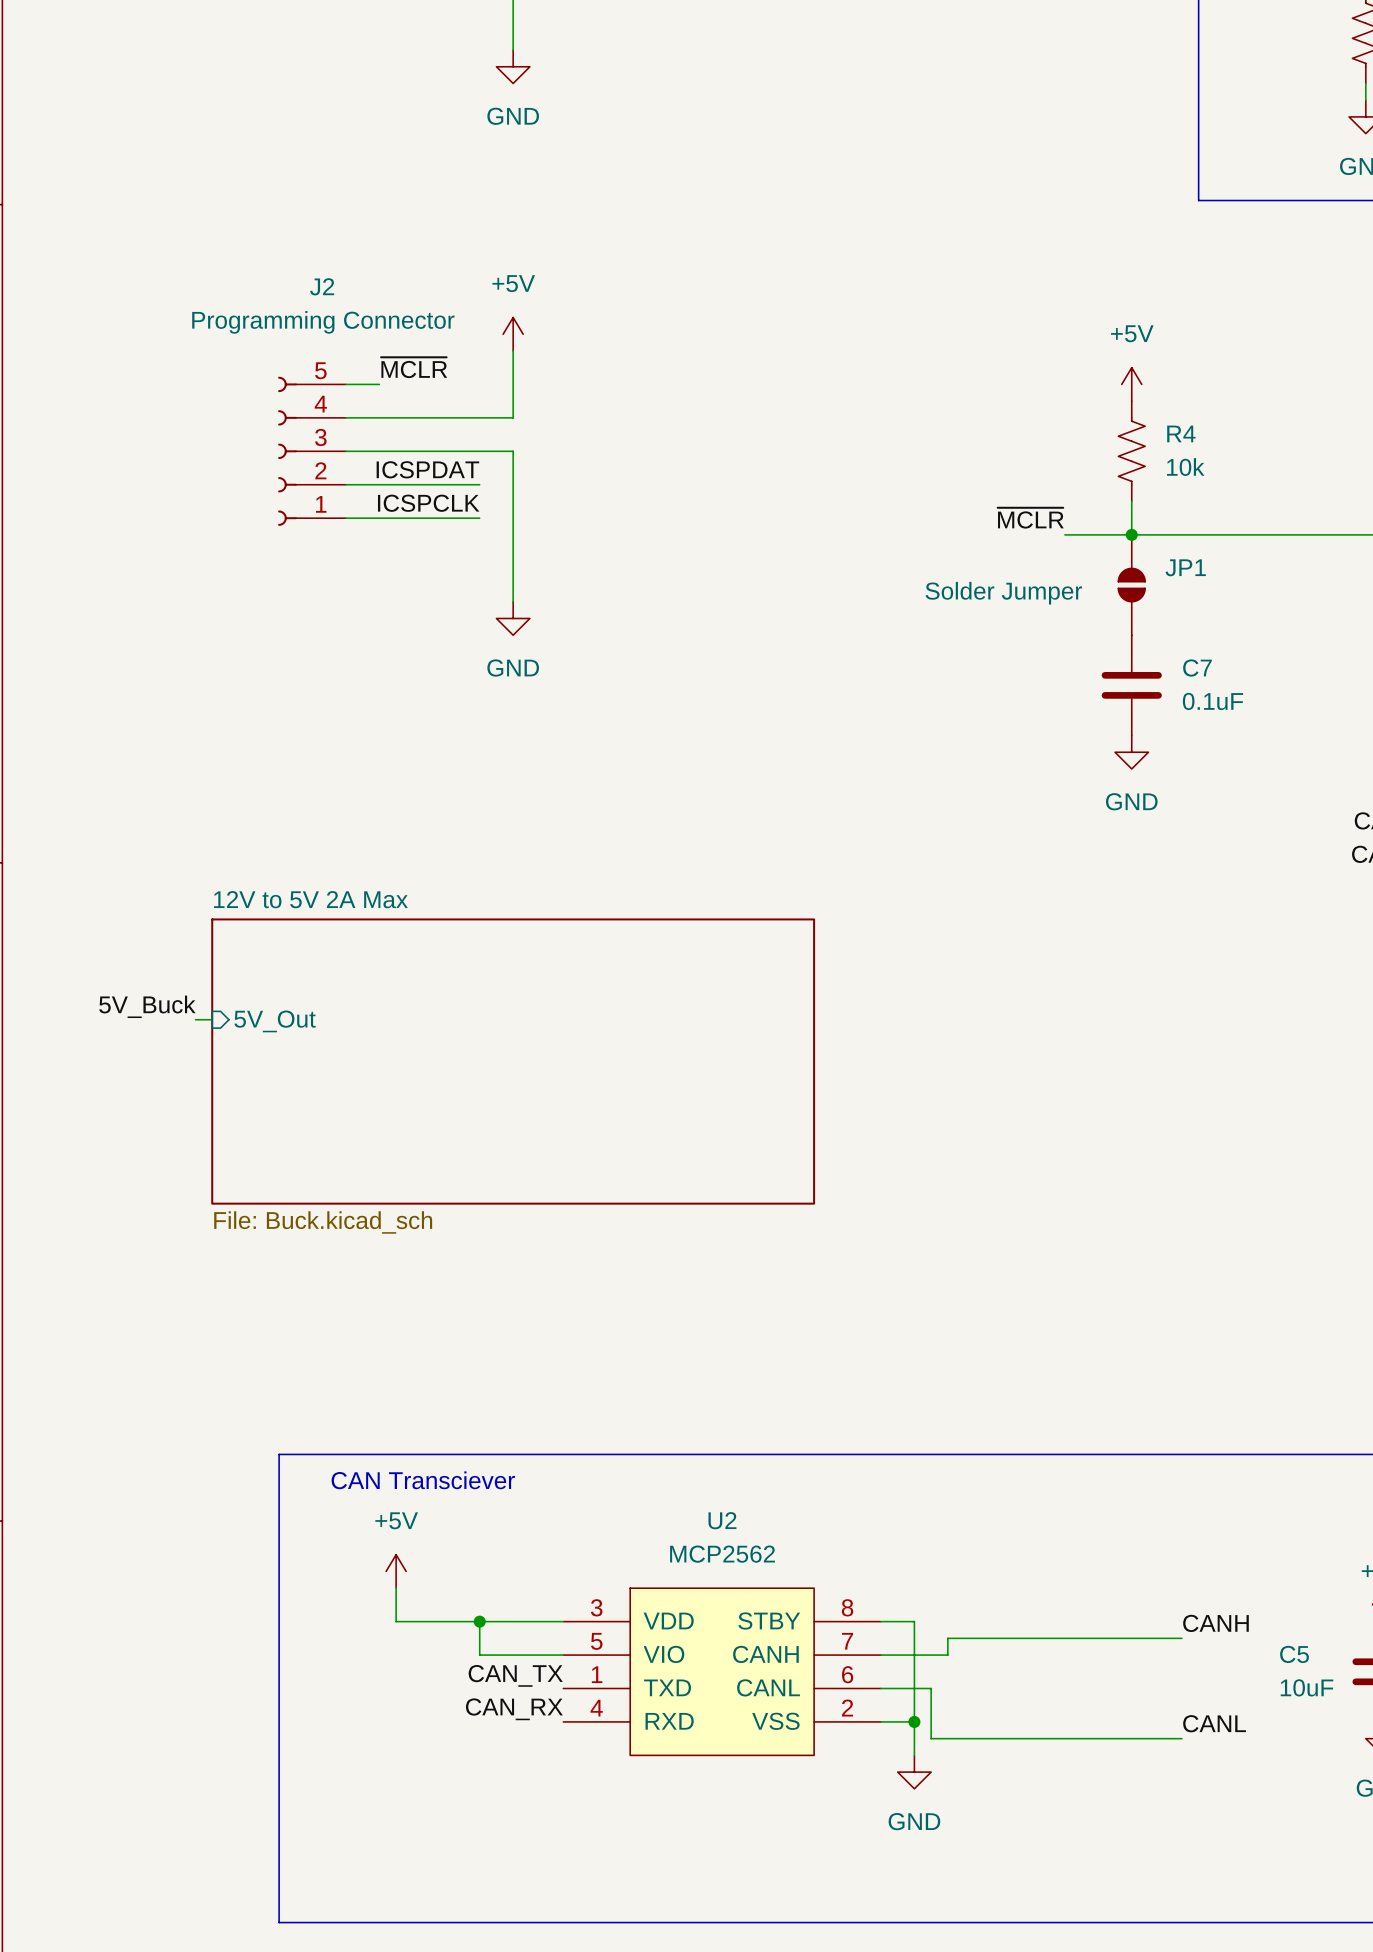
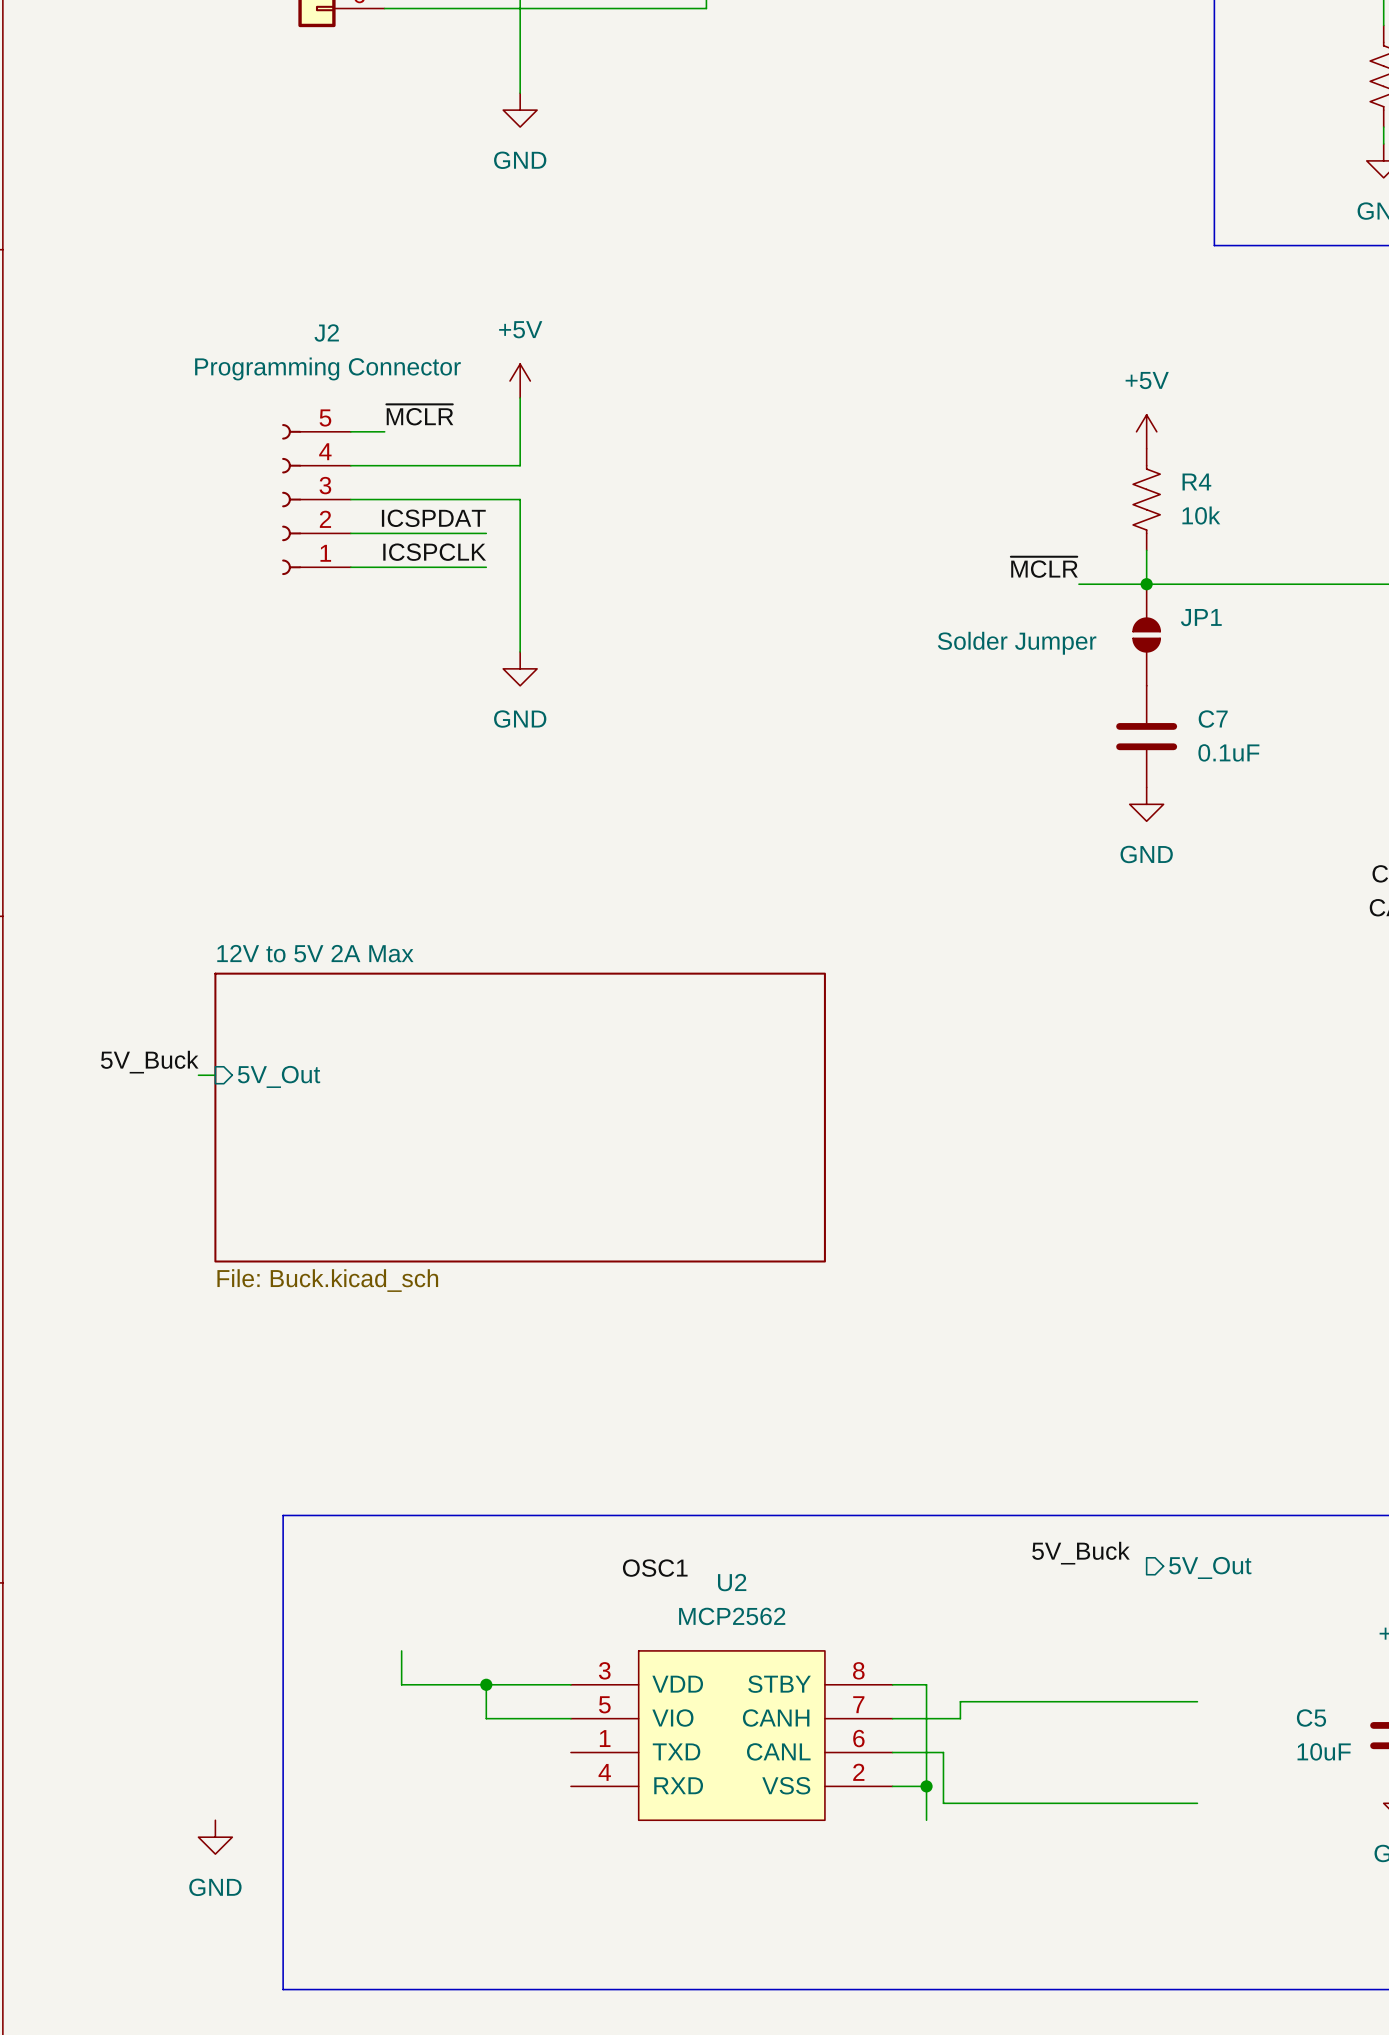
text: CAN Transciever (423, 1480) -> none
label: none -> 5V_Buck (1080, 1553)
label: none -> OSC1 (655, 1568)
sheet pin: none -> 5V_Out (1210, 1567)
power symbol: +5V (396, 1571) -> none
label: CANH (1215, 1623) -> none
label: CAN_TX (515, 1675) -> none
label: CAN_RX (514, 1709) -> none
label: CANL (1214, 1723) -> none
power symbol: none -> GND (215, 1837)
power symbol: GND (914, 1772) -> none

